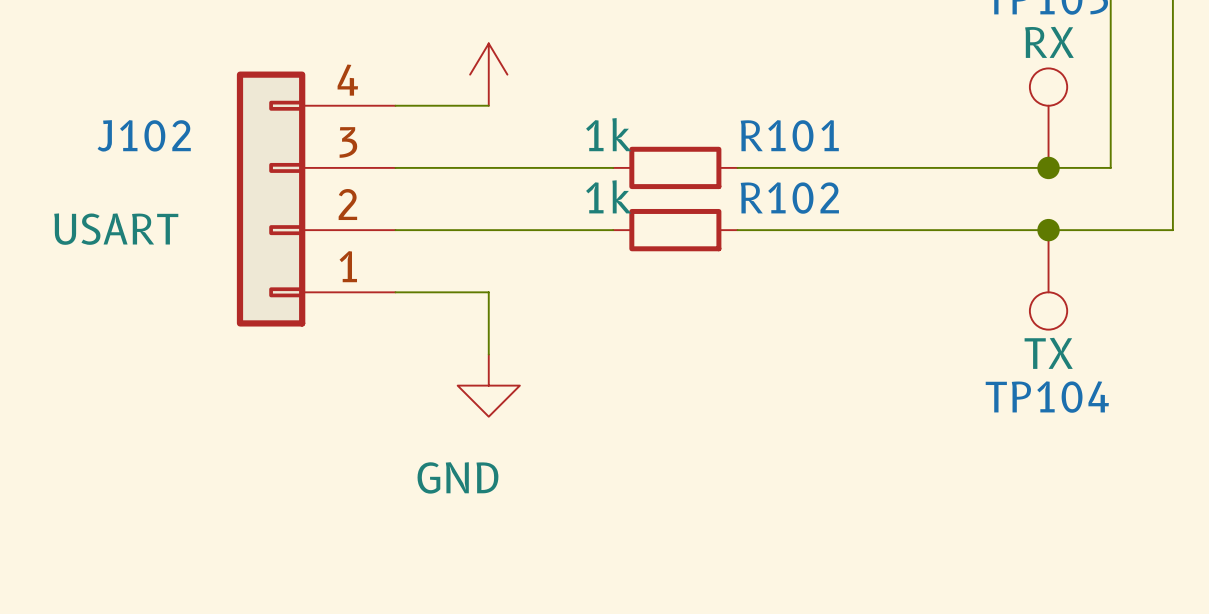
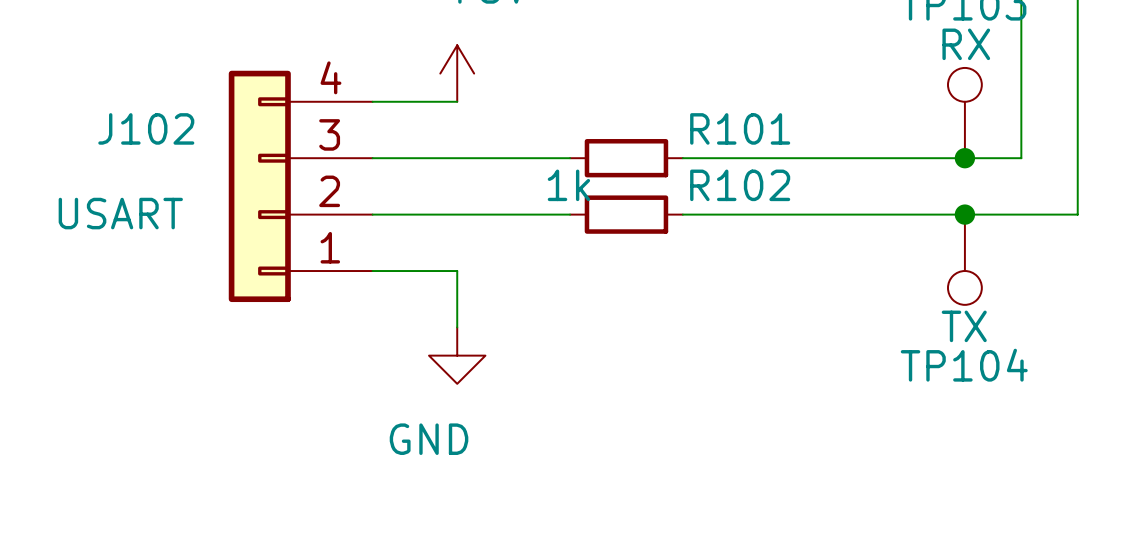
R101 value: 1k (608, 134) -> none

